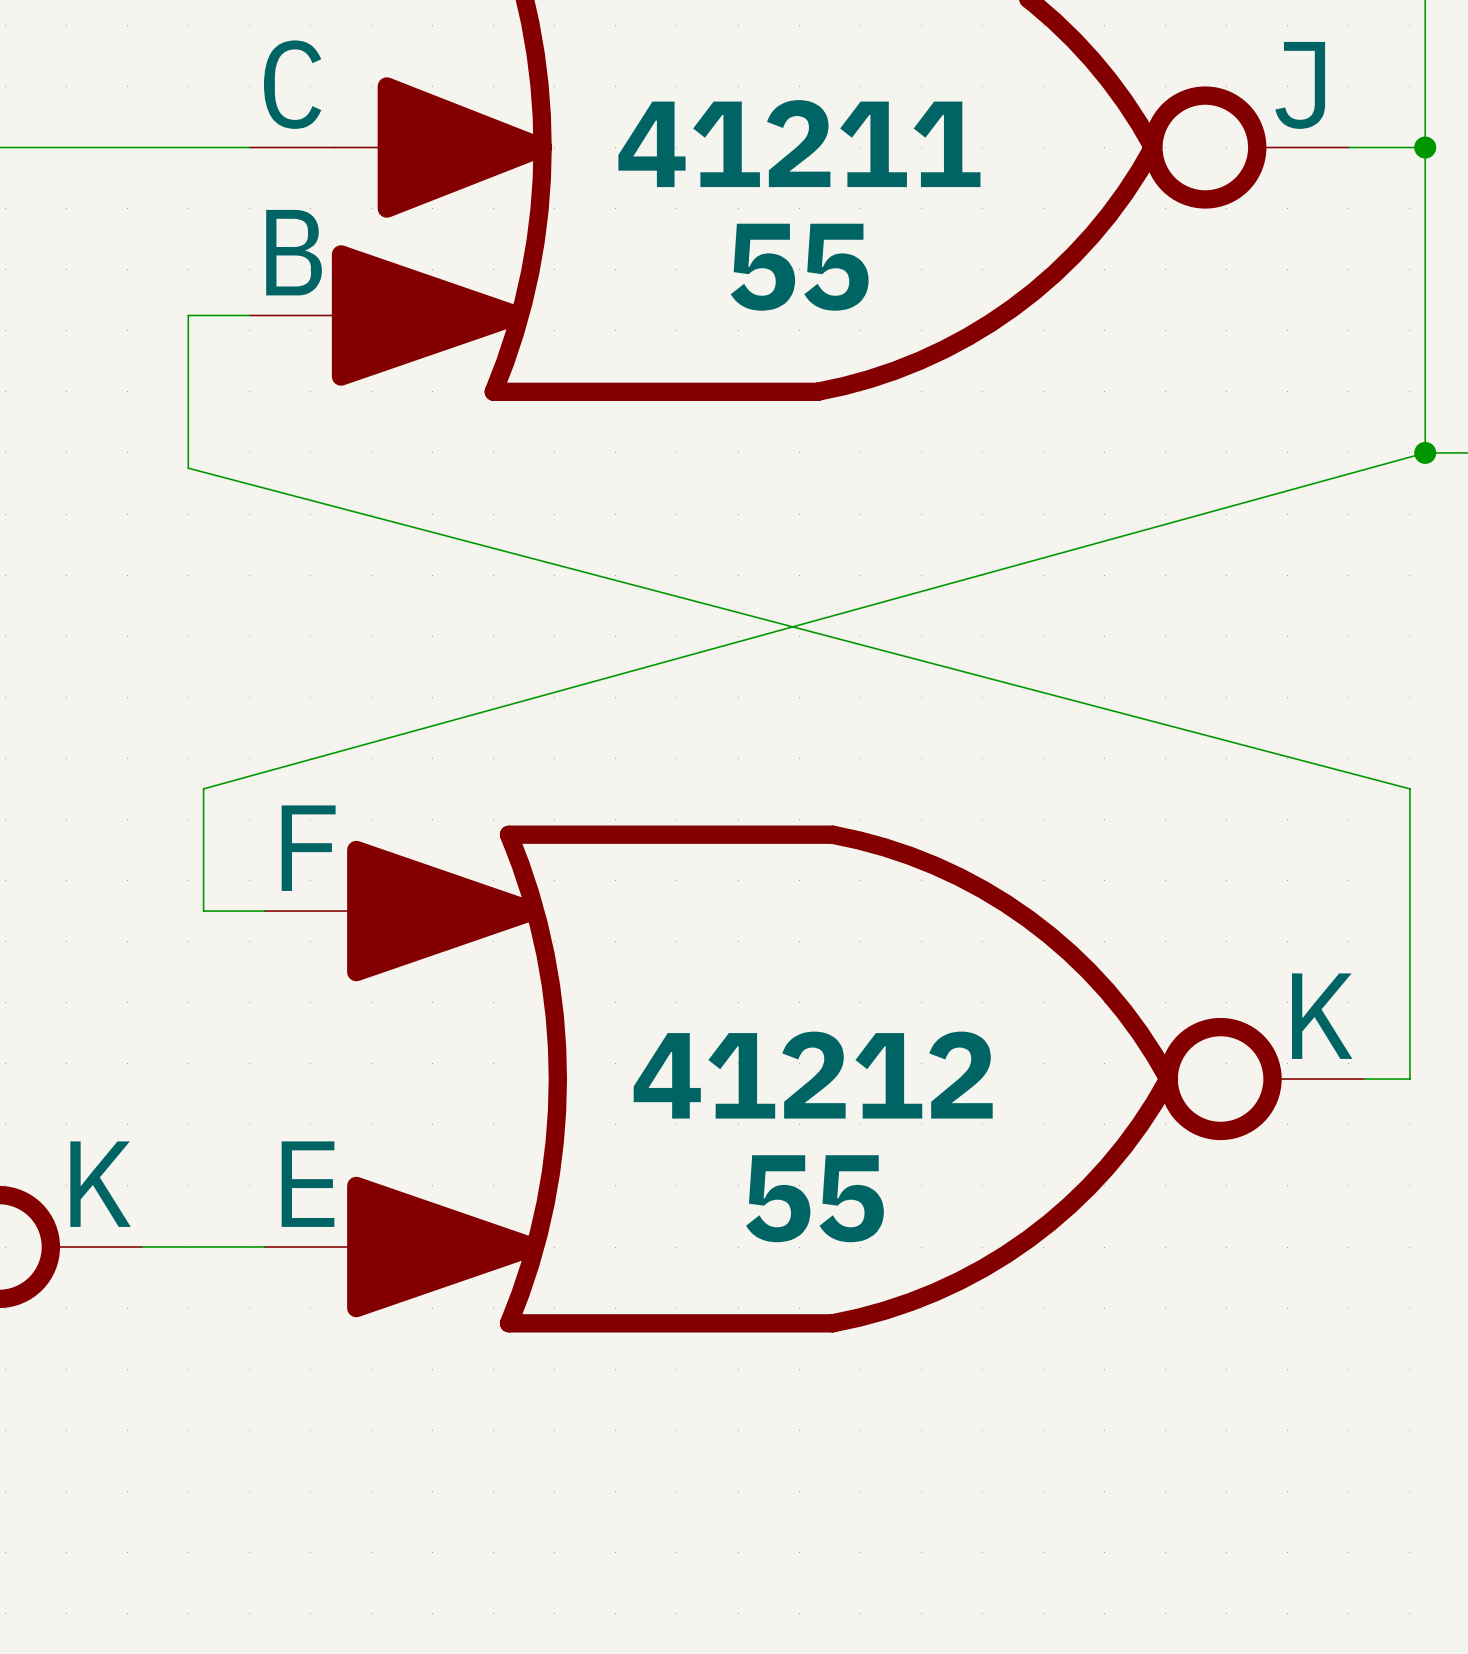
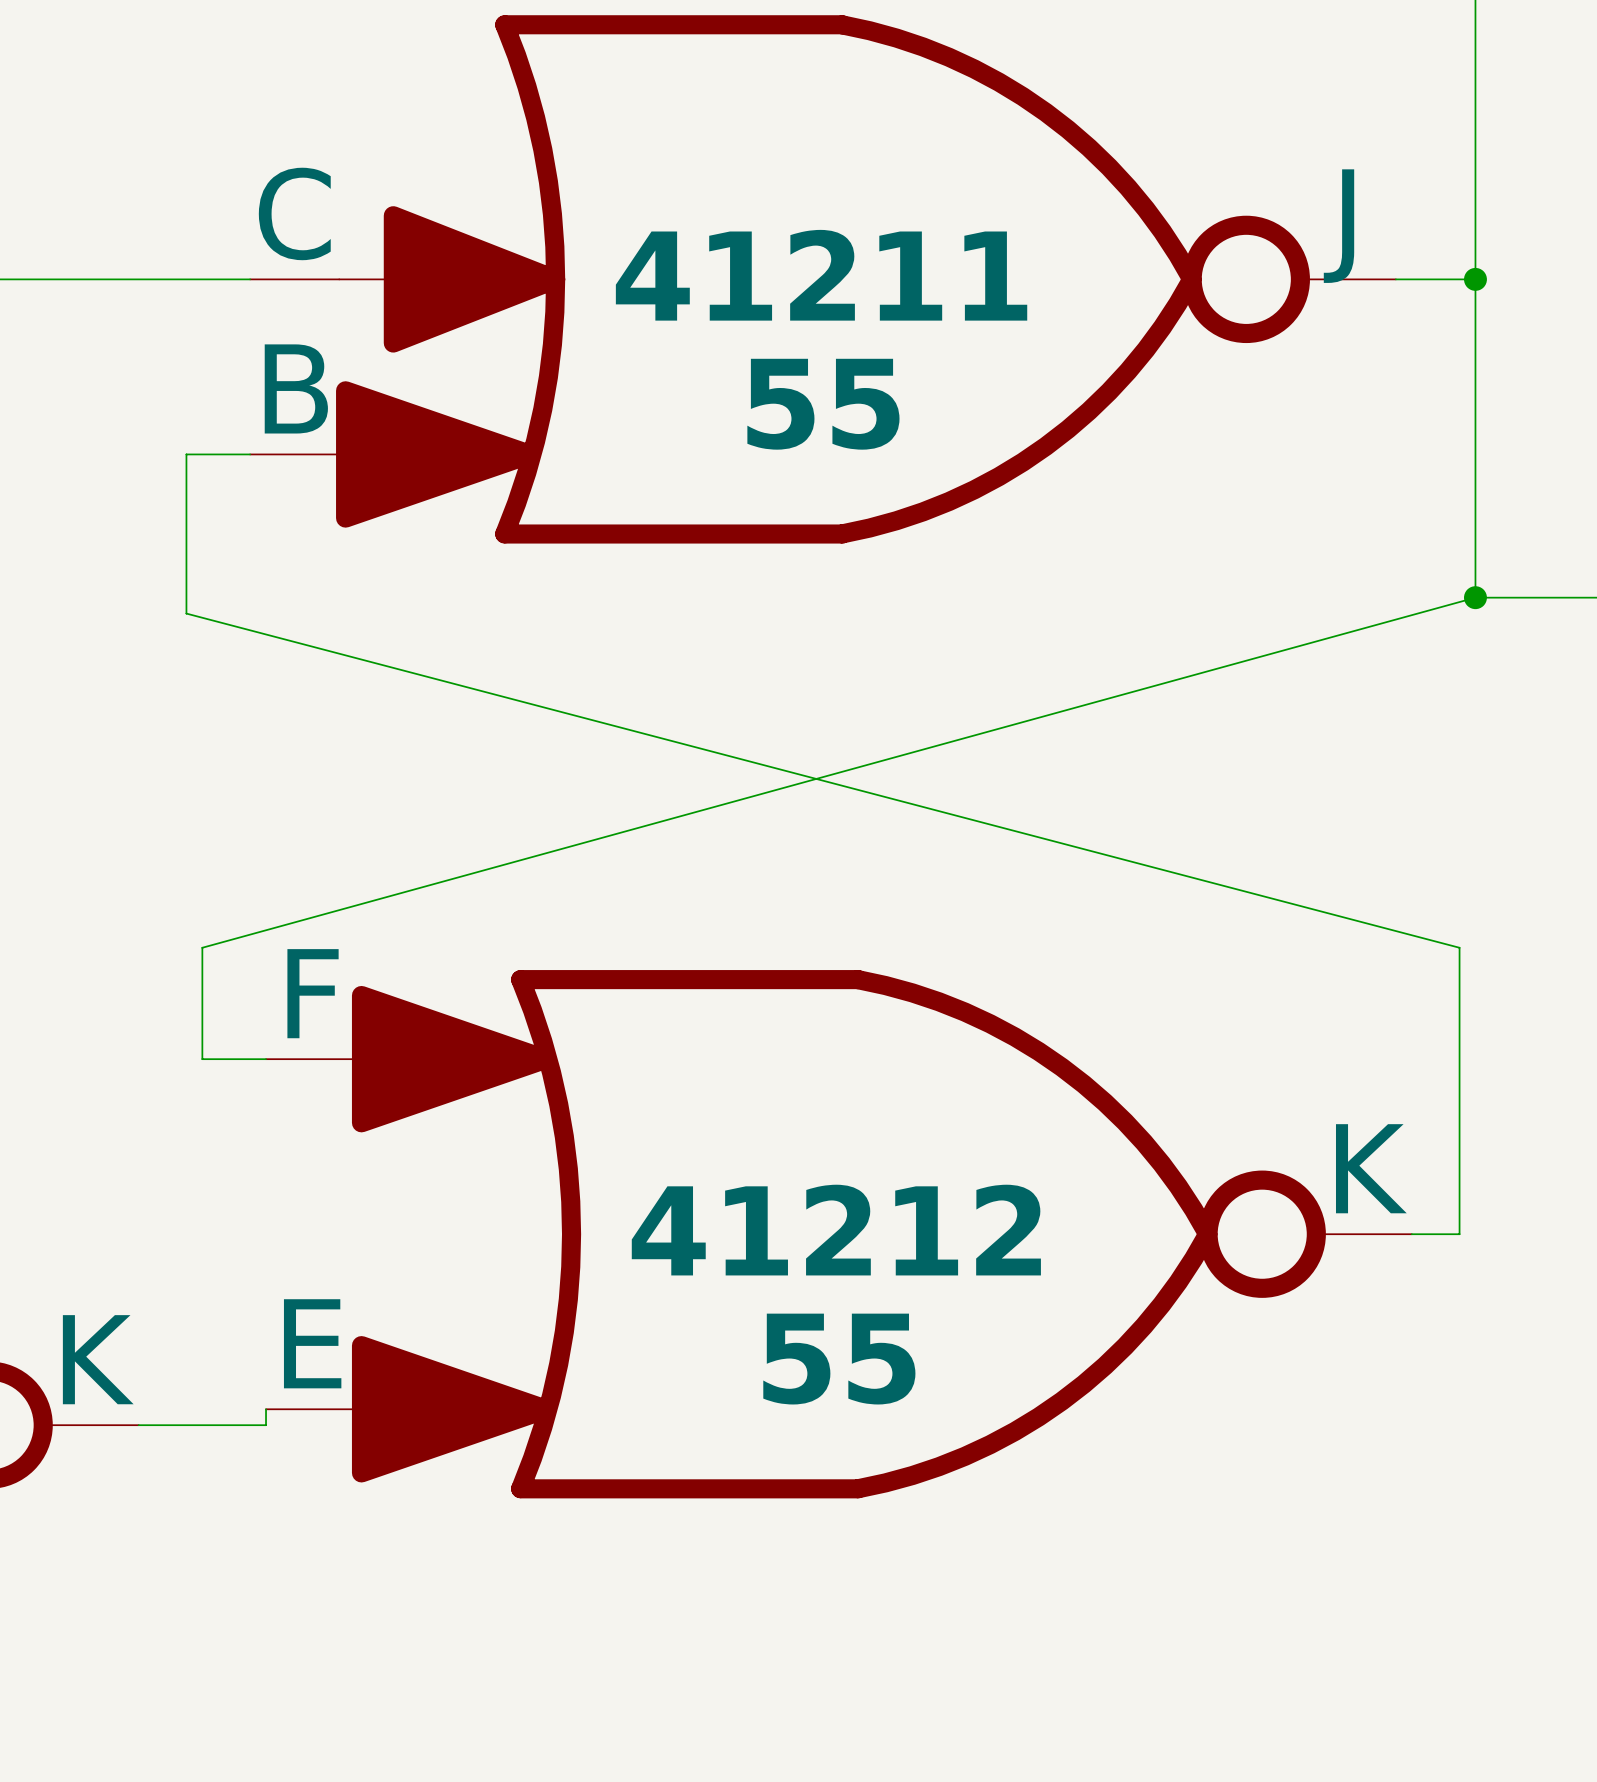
wire: (203, 895) (203, 911) (264, 911) -> (202, 1059) (266, 1059)
wire: (1409, 1063) (1409, 1079) (1364, 1079) -> (1459, 1234) (1411, 1234)
part position: (814, 1079) -> (838, 1234)
wire: none -> (266, 1409) (266, 1425)

